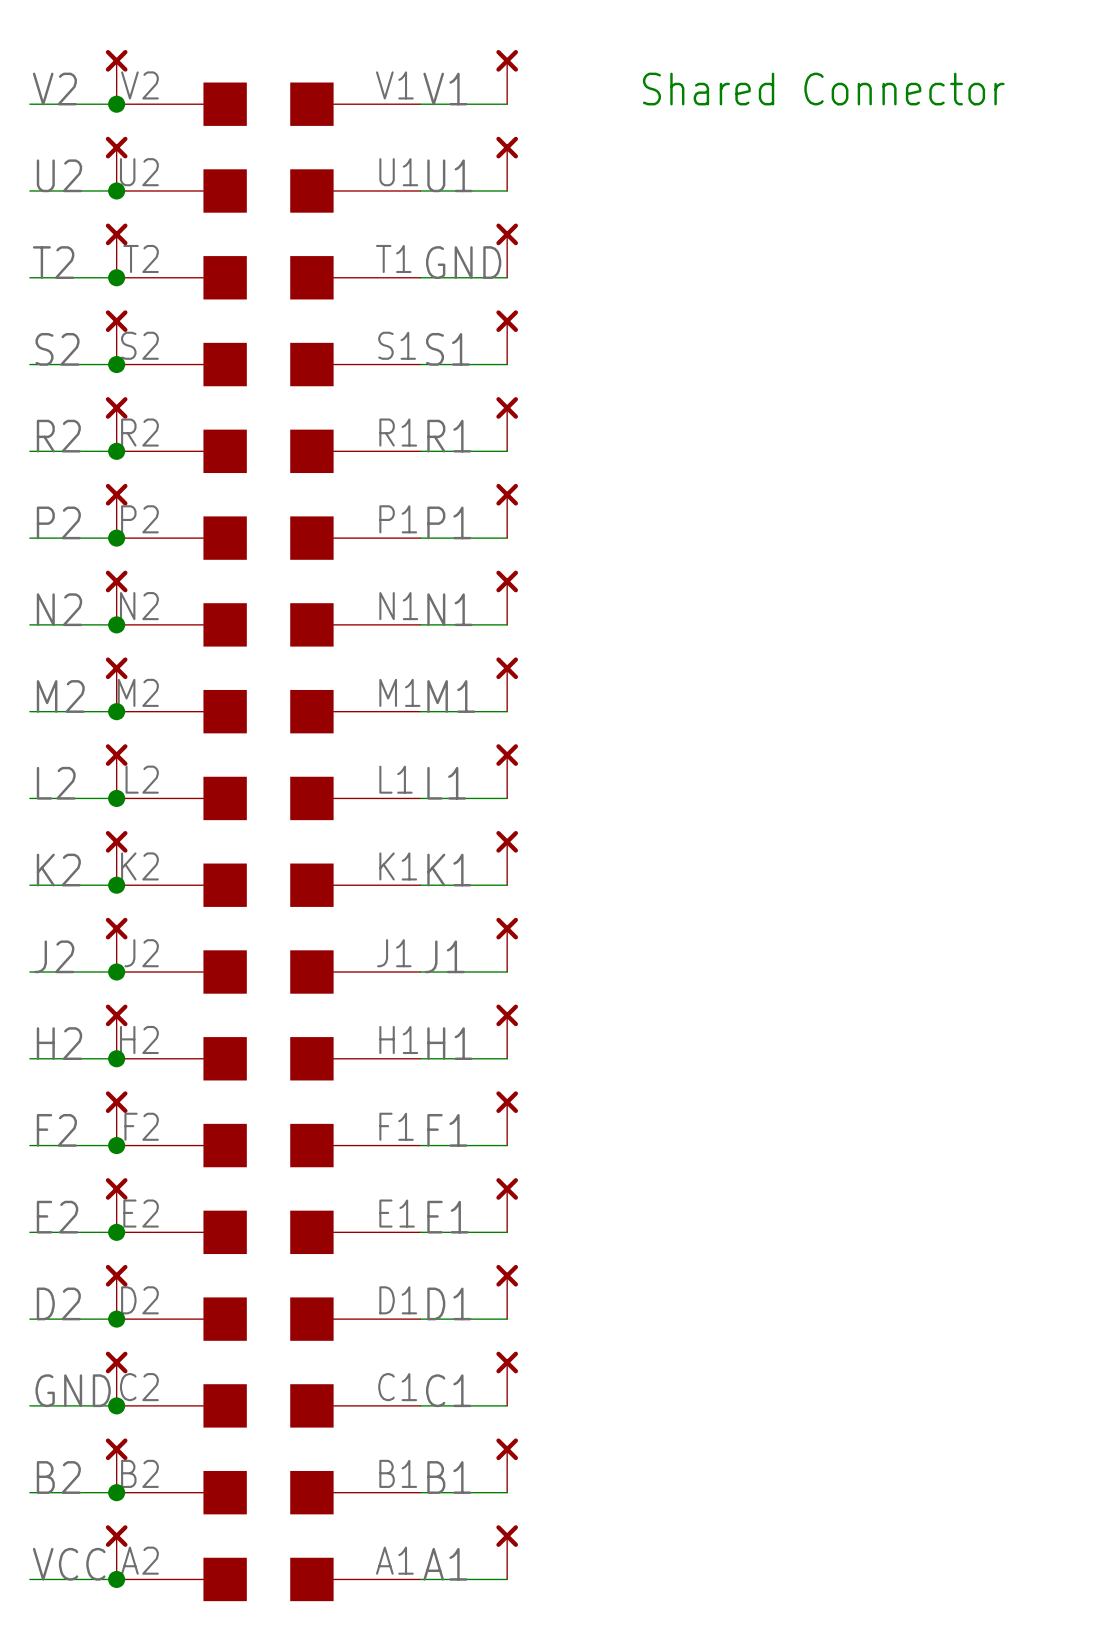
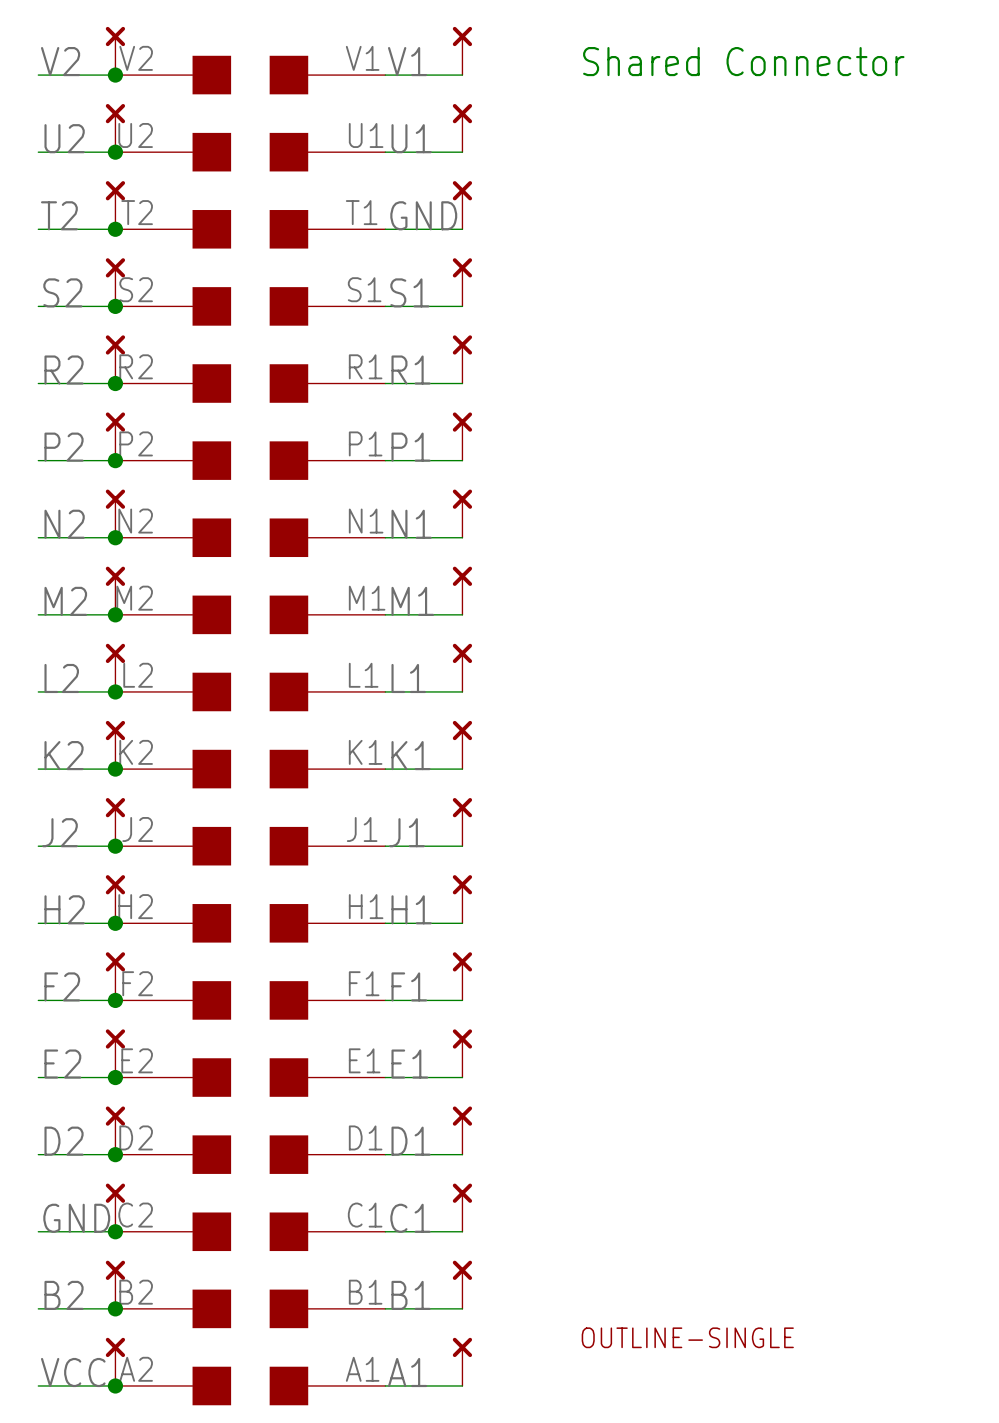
part: none -> OUTLINE-SINGLE (687, 1337)

